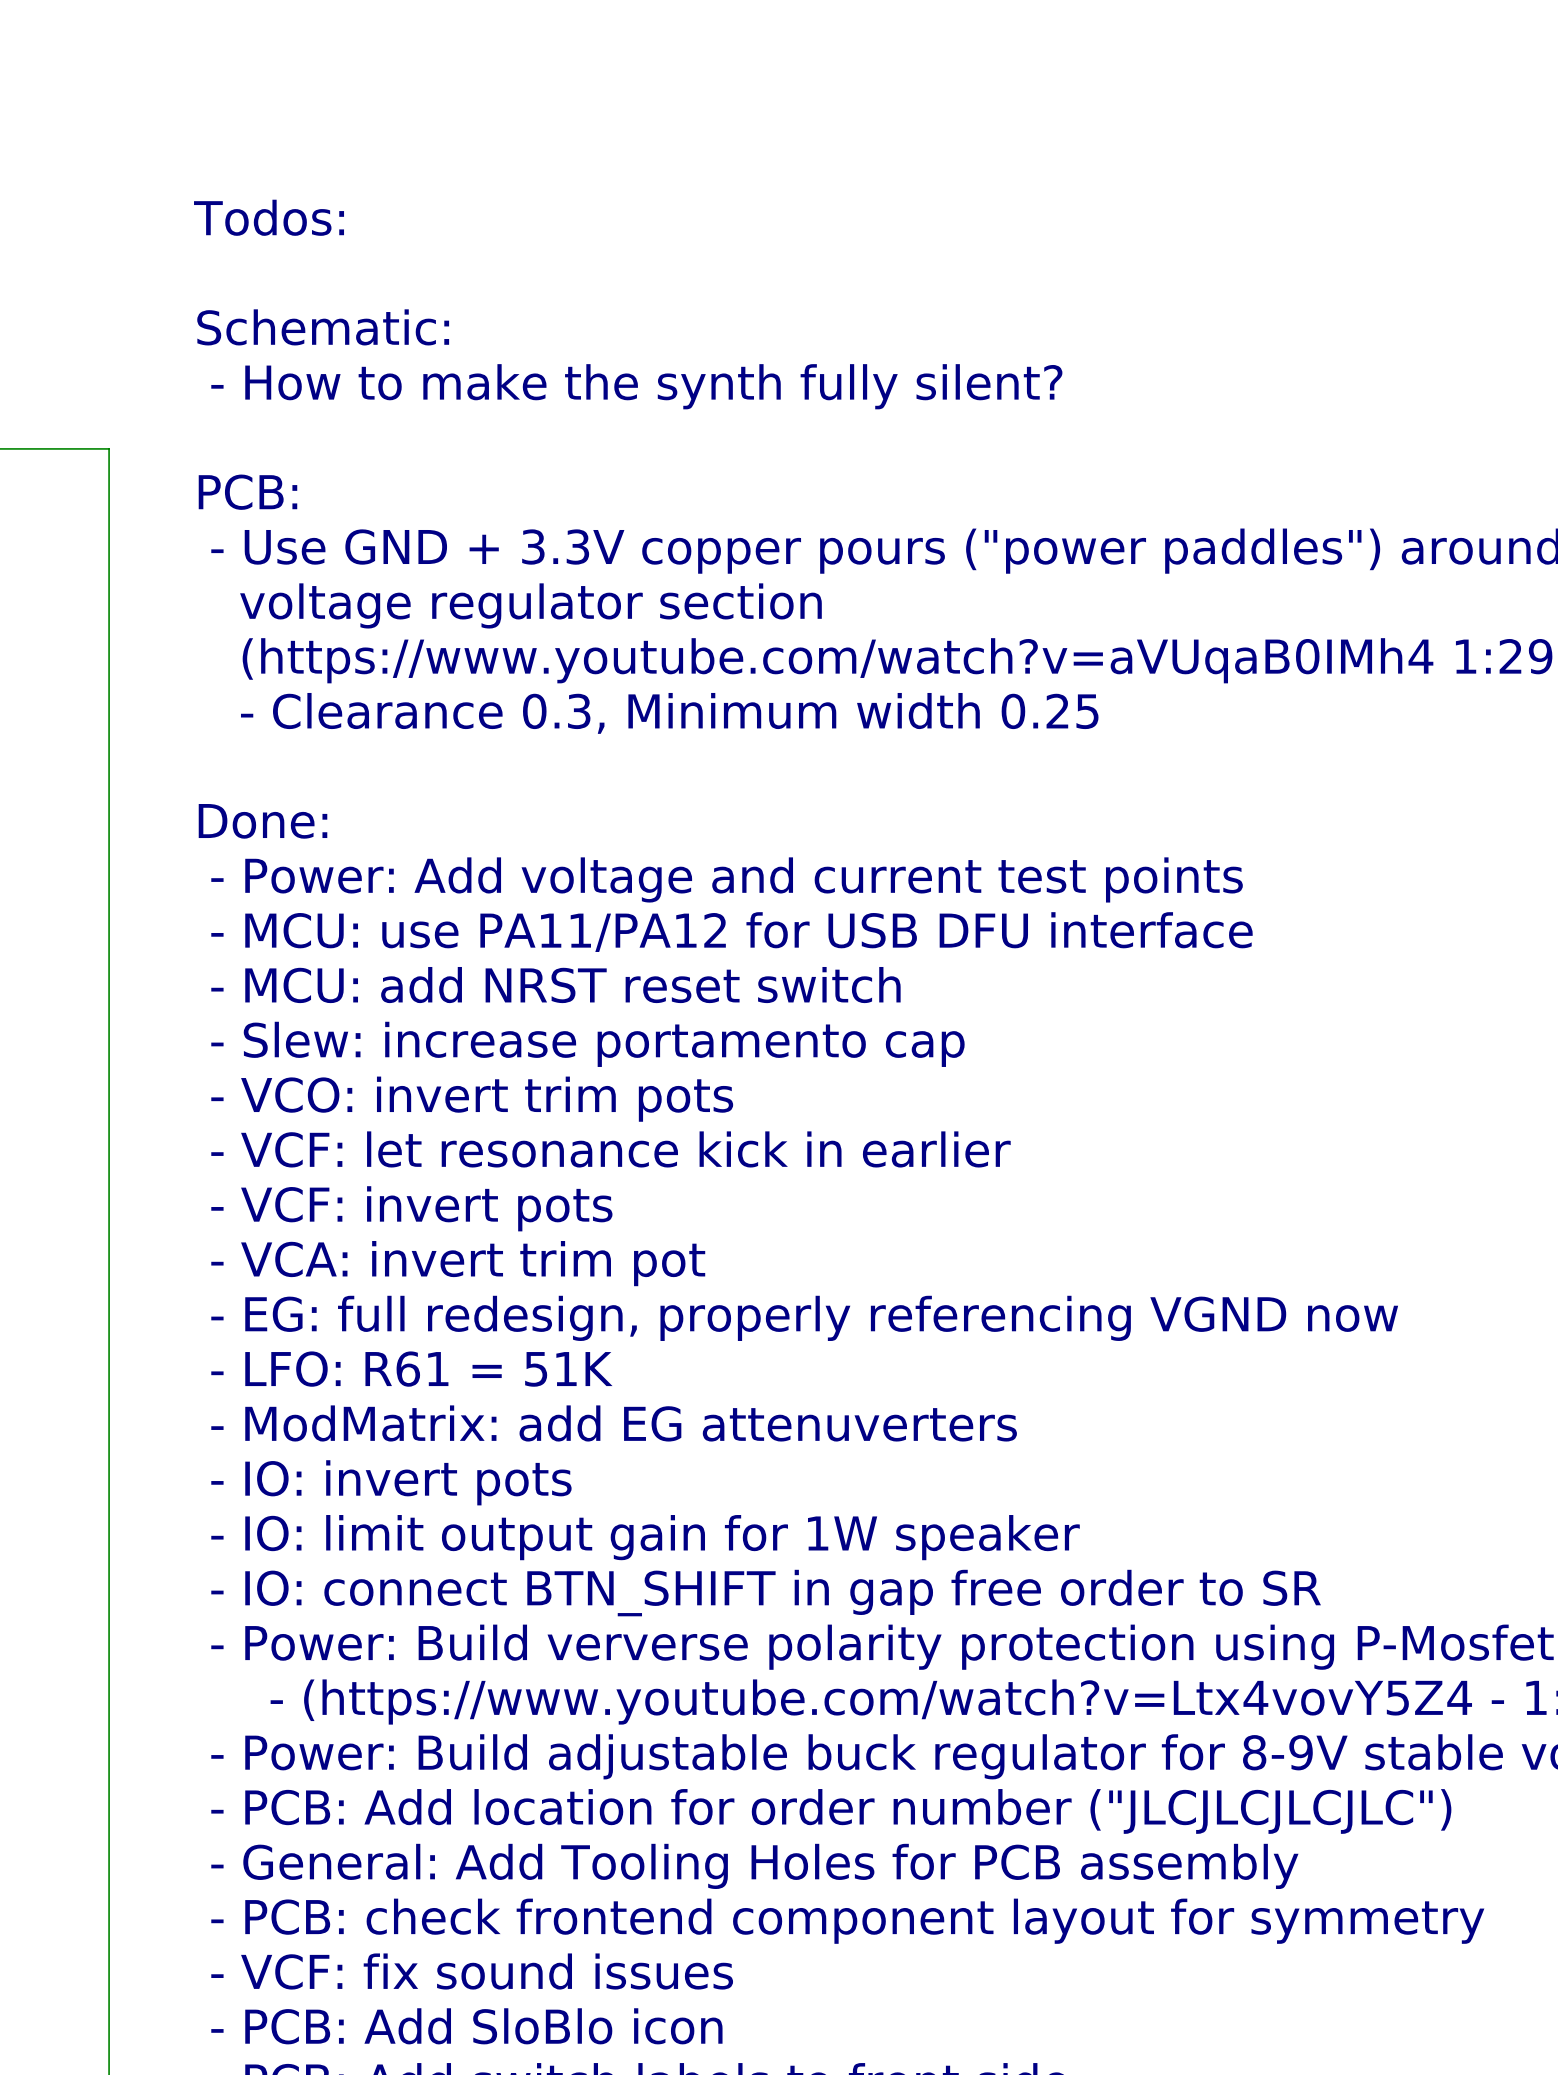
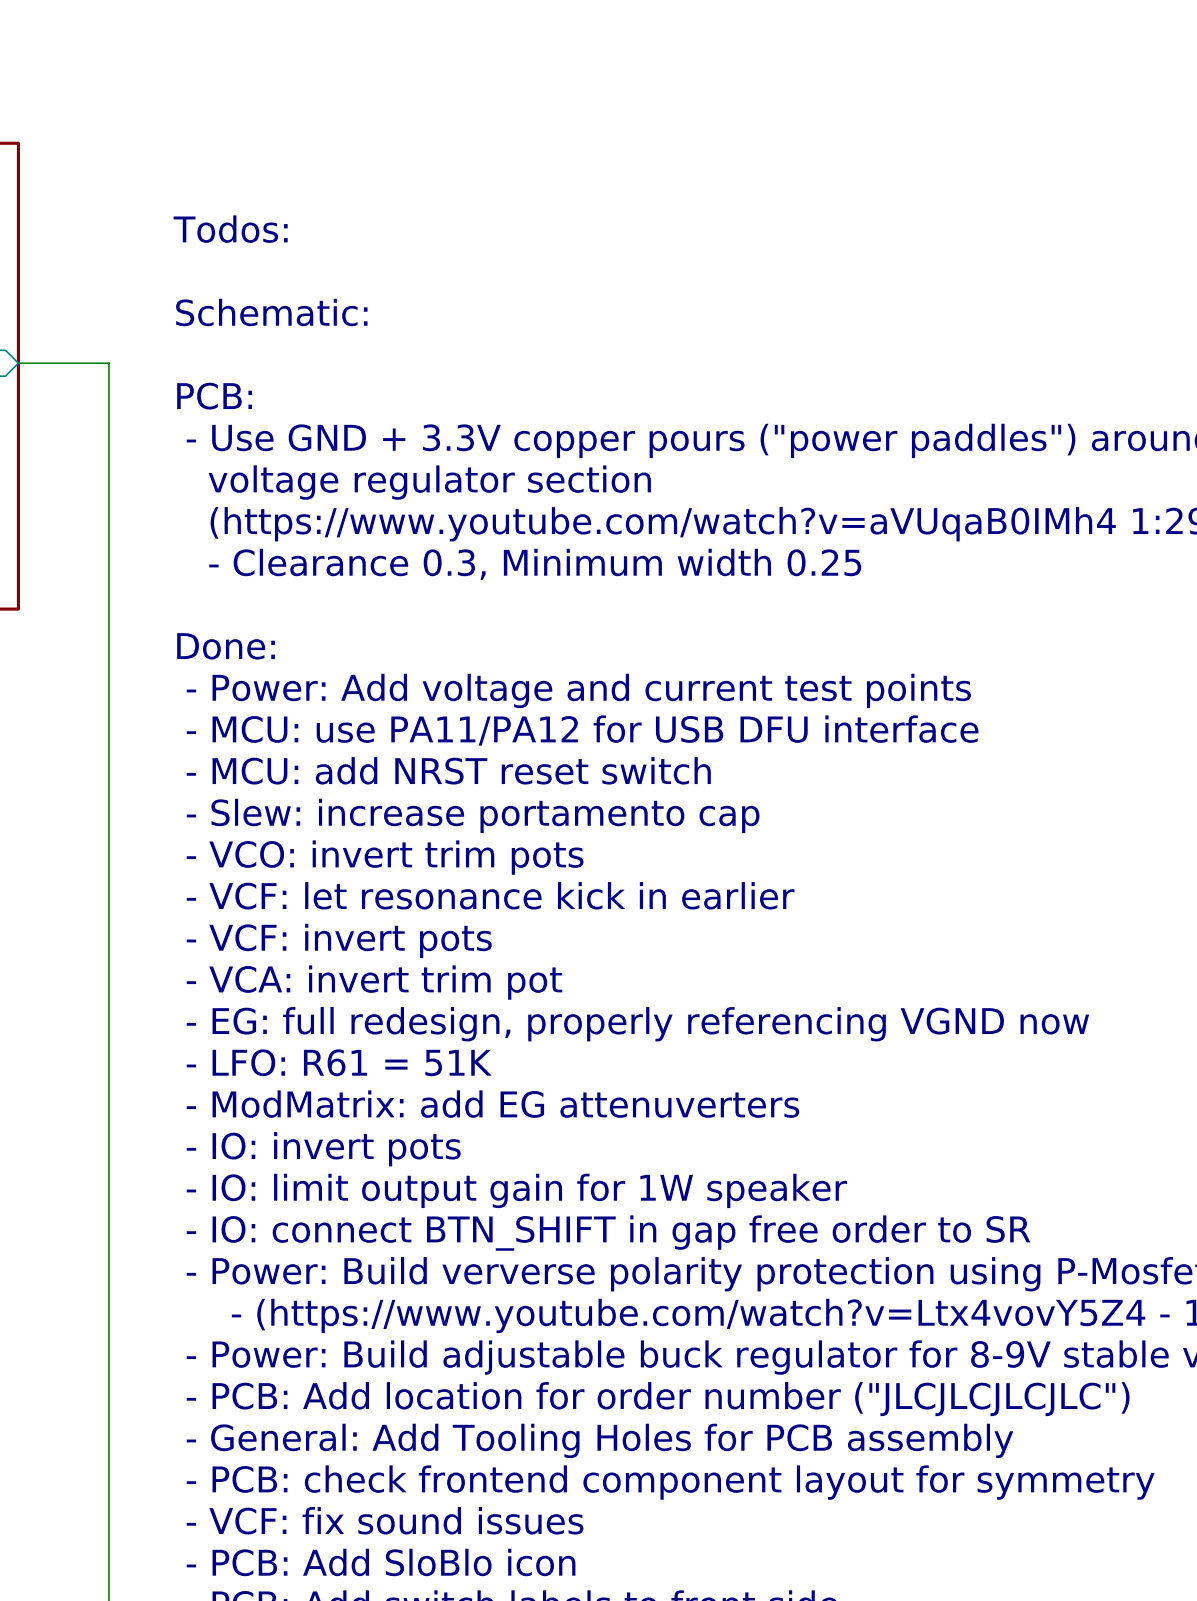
text position: Todos: (269, 217) -> Todos: (230, 229)
text: Schematic: (323, 327) -> none
text: - How to make the synth fully silent? (636, 386) -> Schematic: (271, 312)

